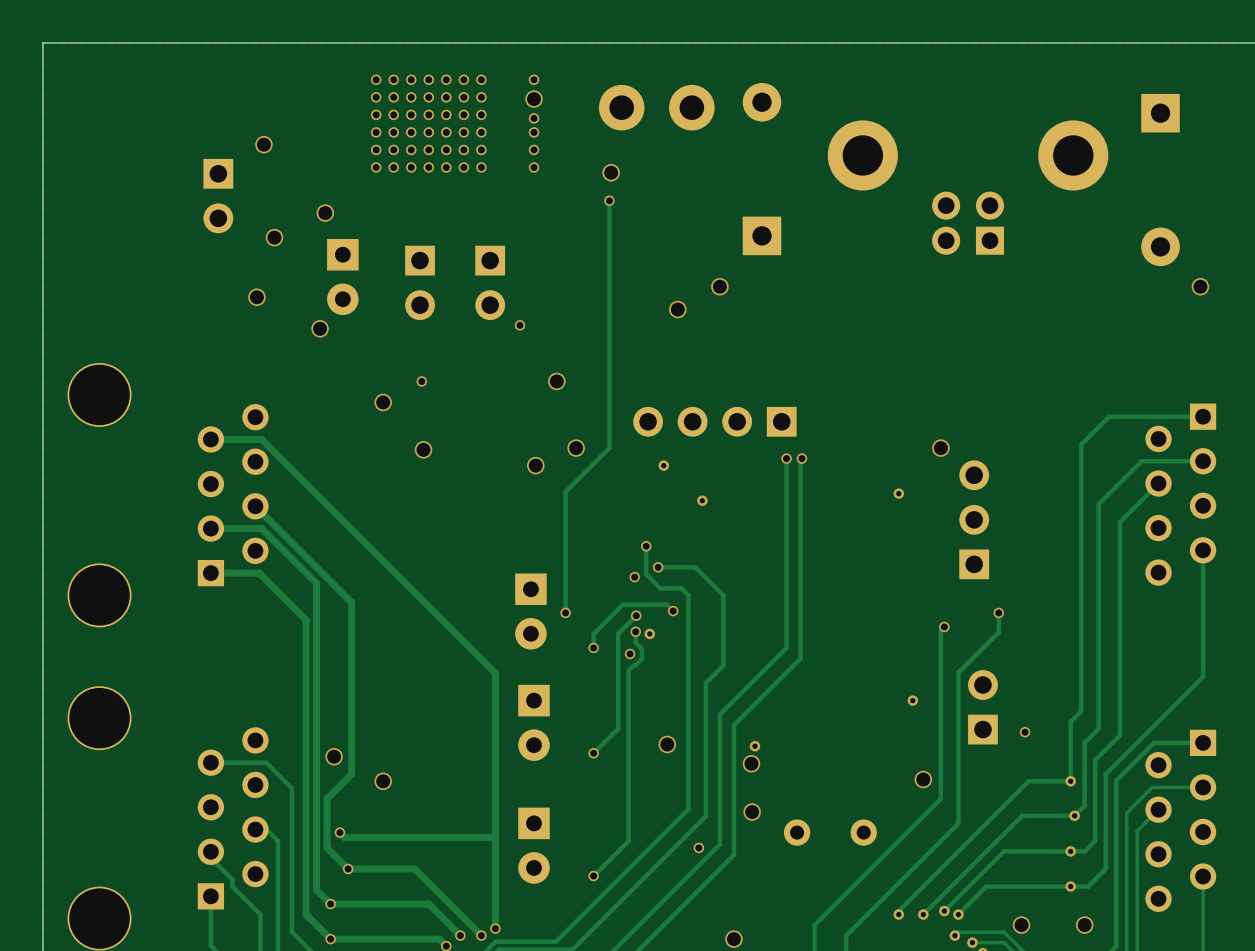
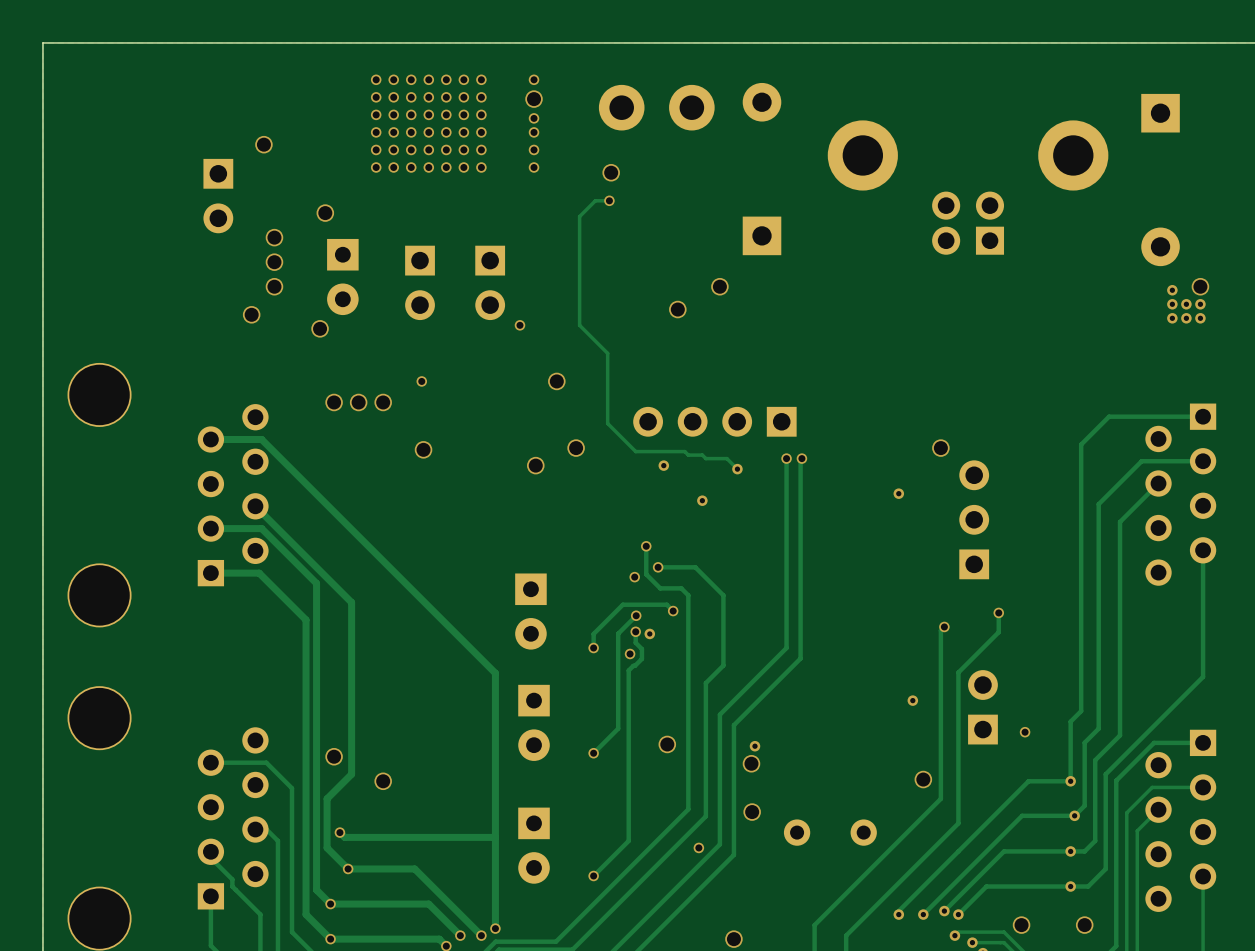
track: (609, 200) (609, 448) (565, 491) (565, 612) -> (609, 200) (595, 200) (579, 216) (579, 325) (607, 353) (607, 423) (635, 451) (684, 451) (688, 455) (702, 455) (705, 458) (726, 458) (737, 469)
via: none -> (274, 262)
via: none -> (274, 286)
via: none -> (1172, 290)
via: (256, 297) -> none
via: none -> (1172, 304)
via: none -> (1186, 304)
via: none -> (1200, 304)
via: none -> (251, 314)
via: none -> (1172, 318)
via: none -> (1186, 318)
via: none -> (1200, 318)
via: none -> (334, 402)
via: none -> (358, 402)
via: none -> (737, 469)
via: (565, 612) -> none

